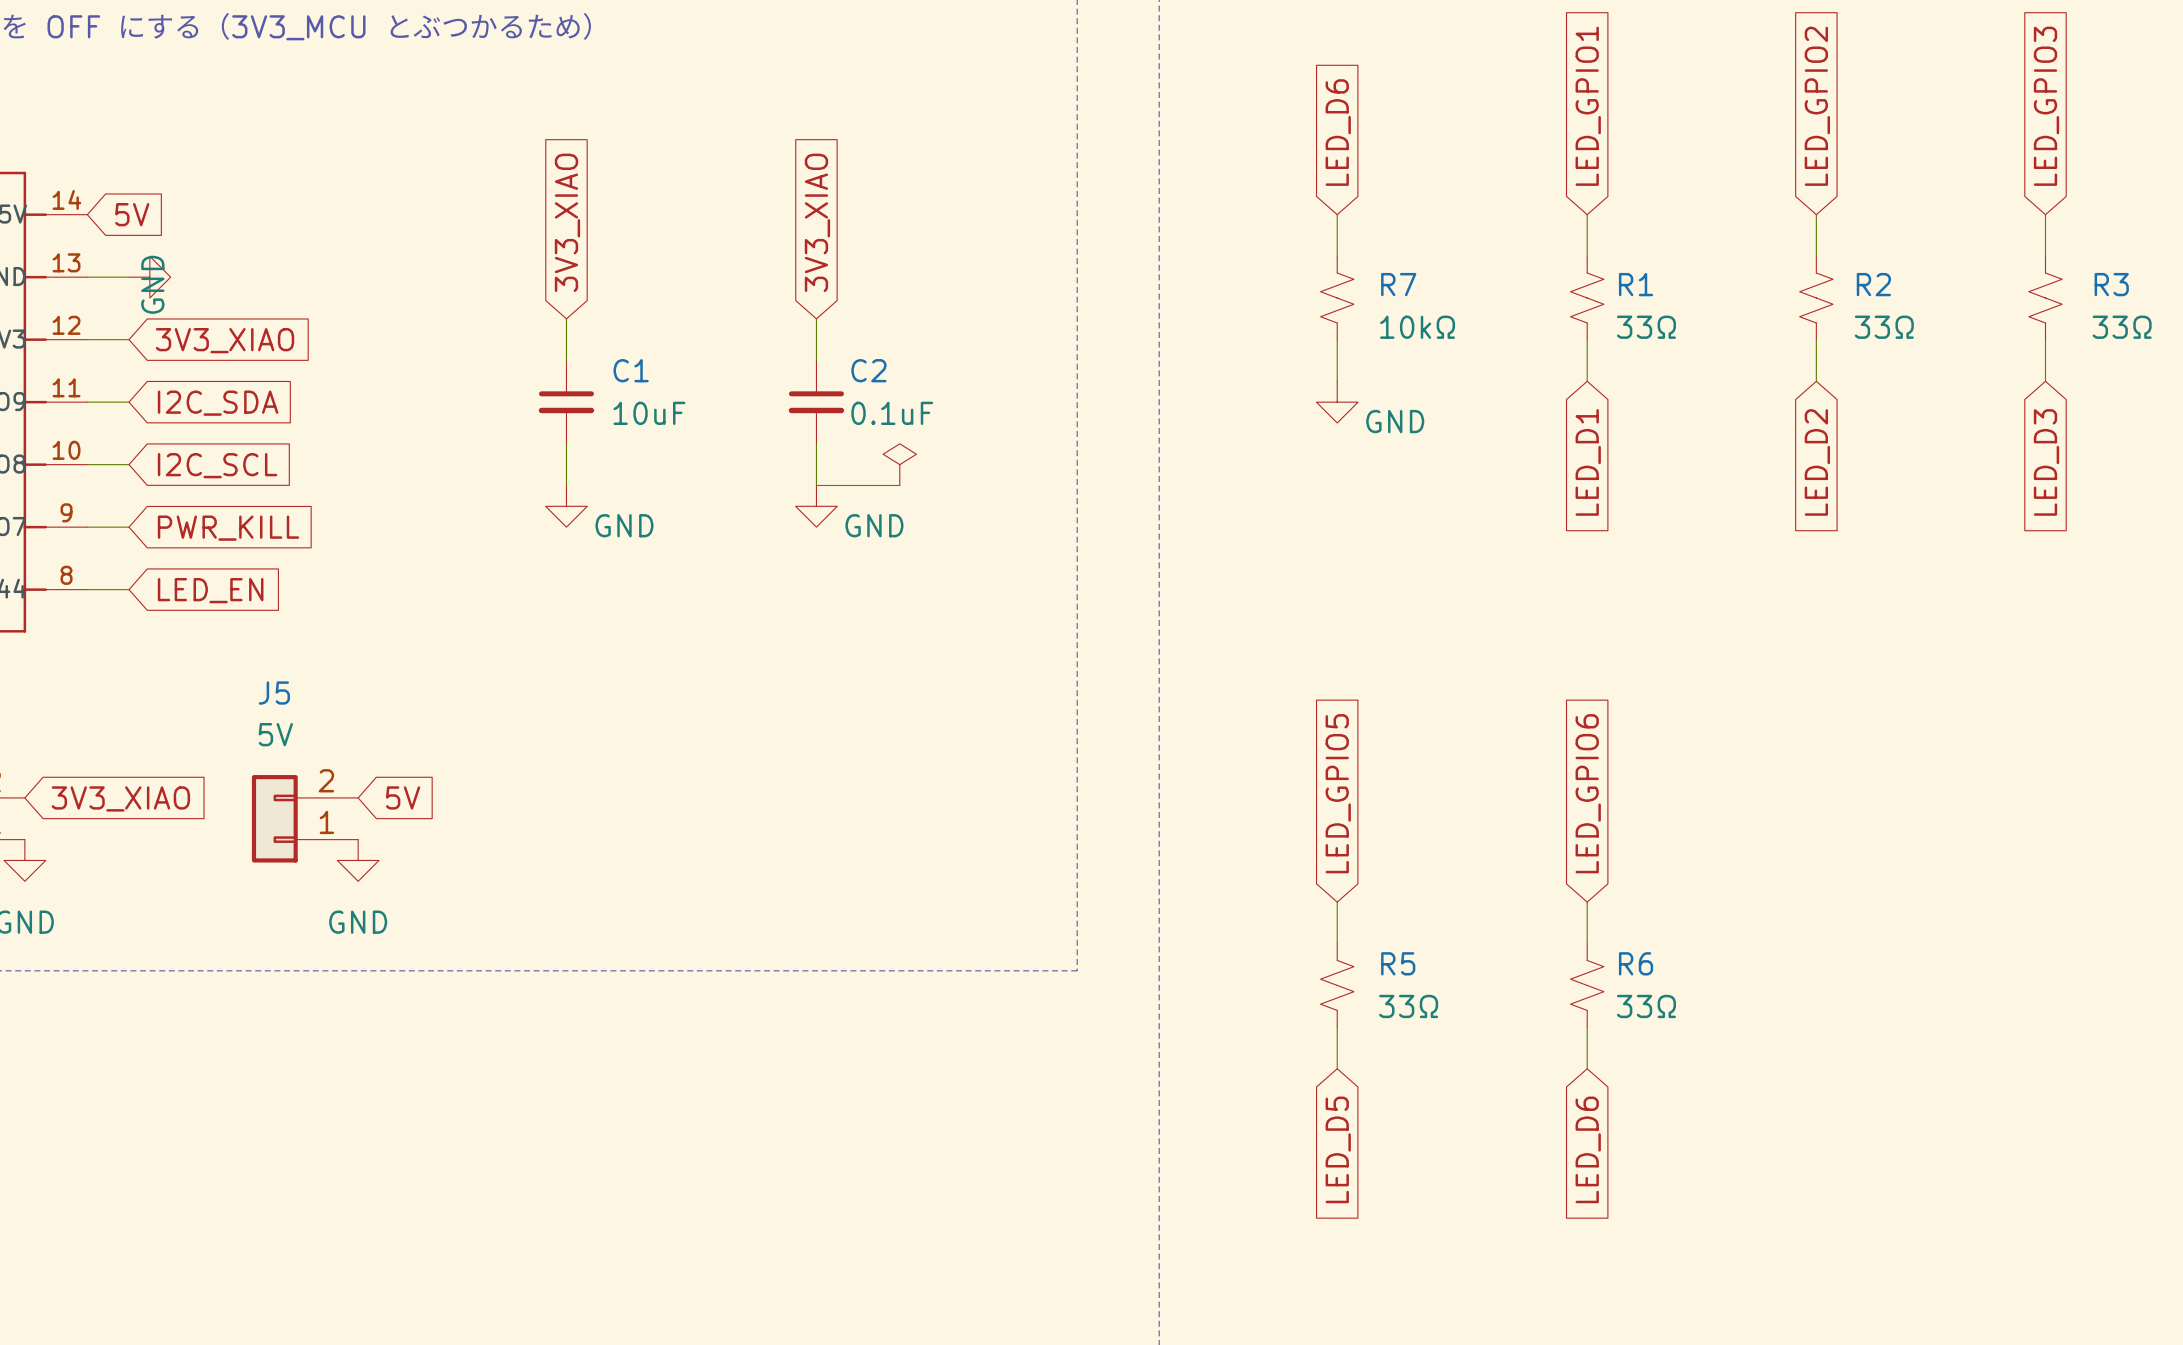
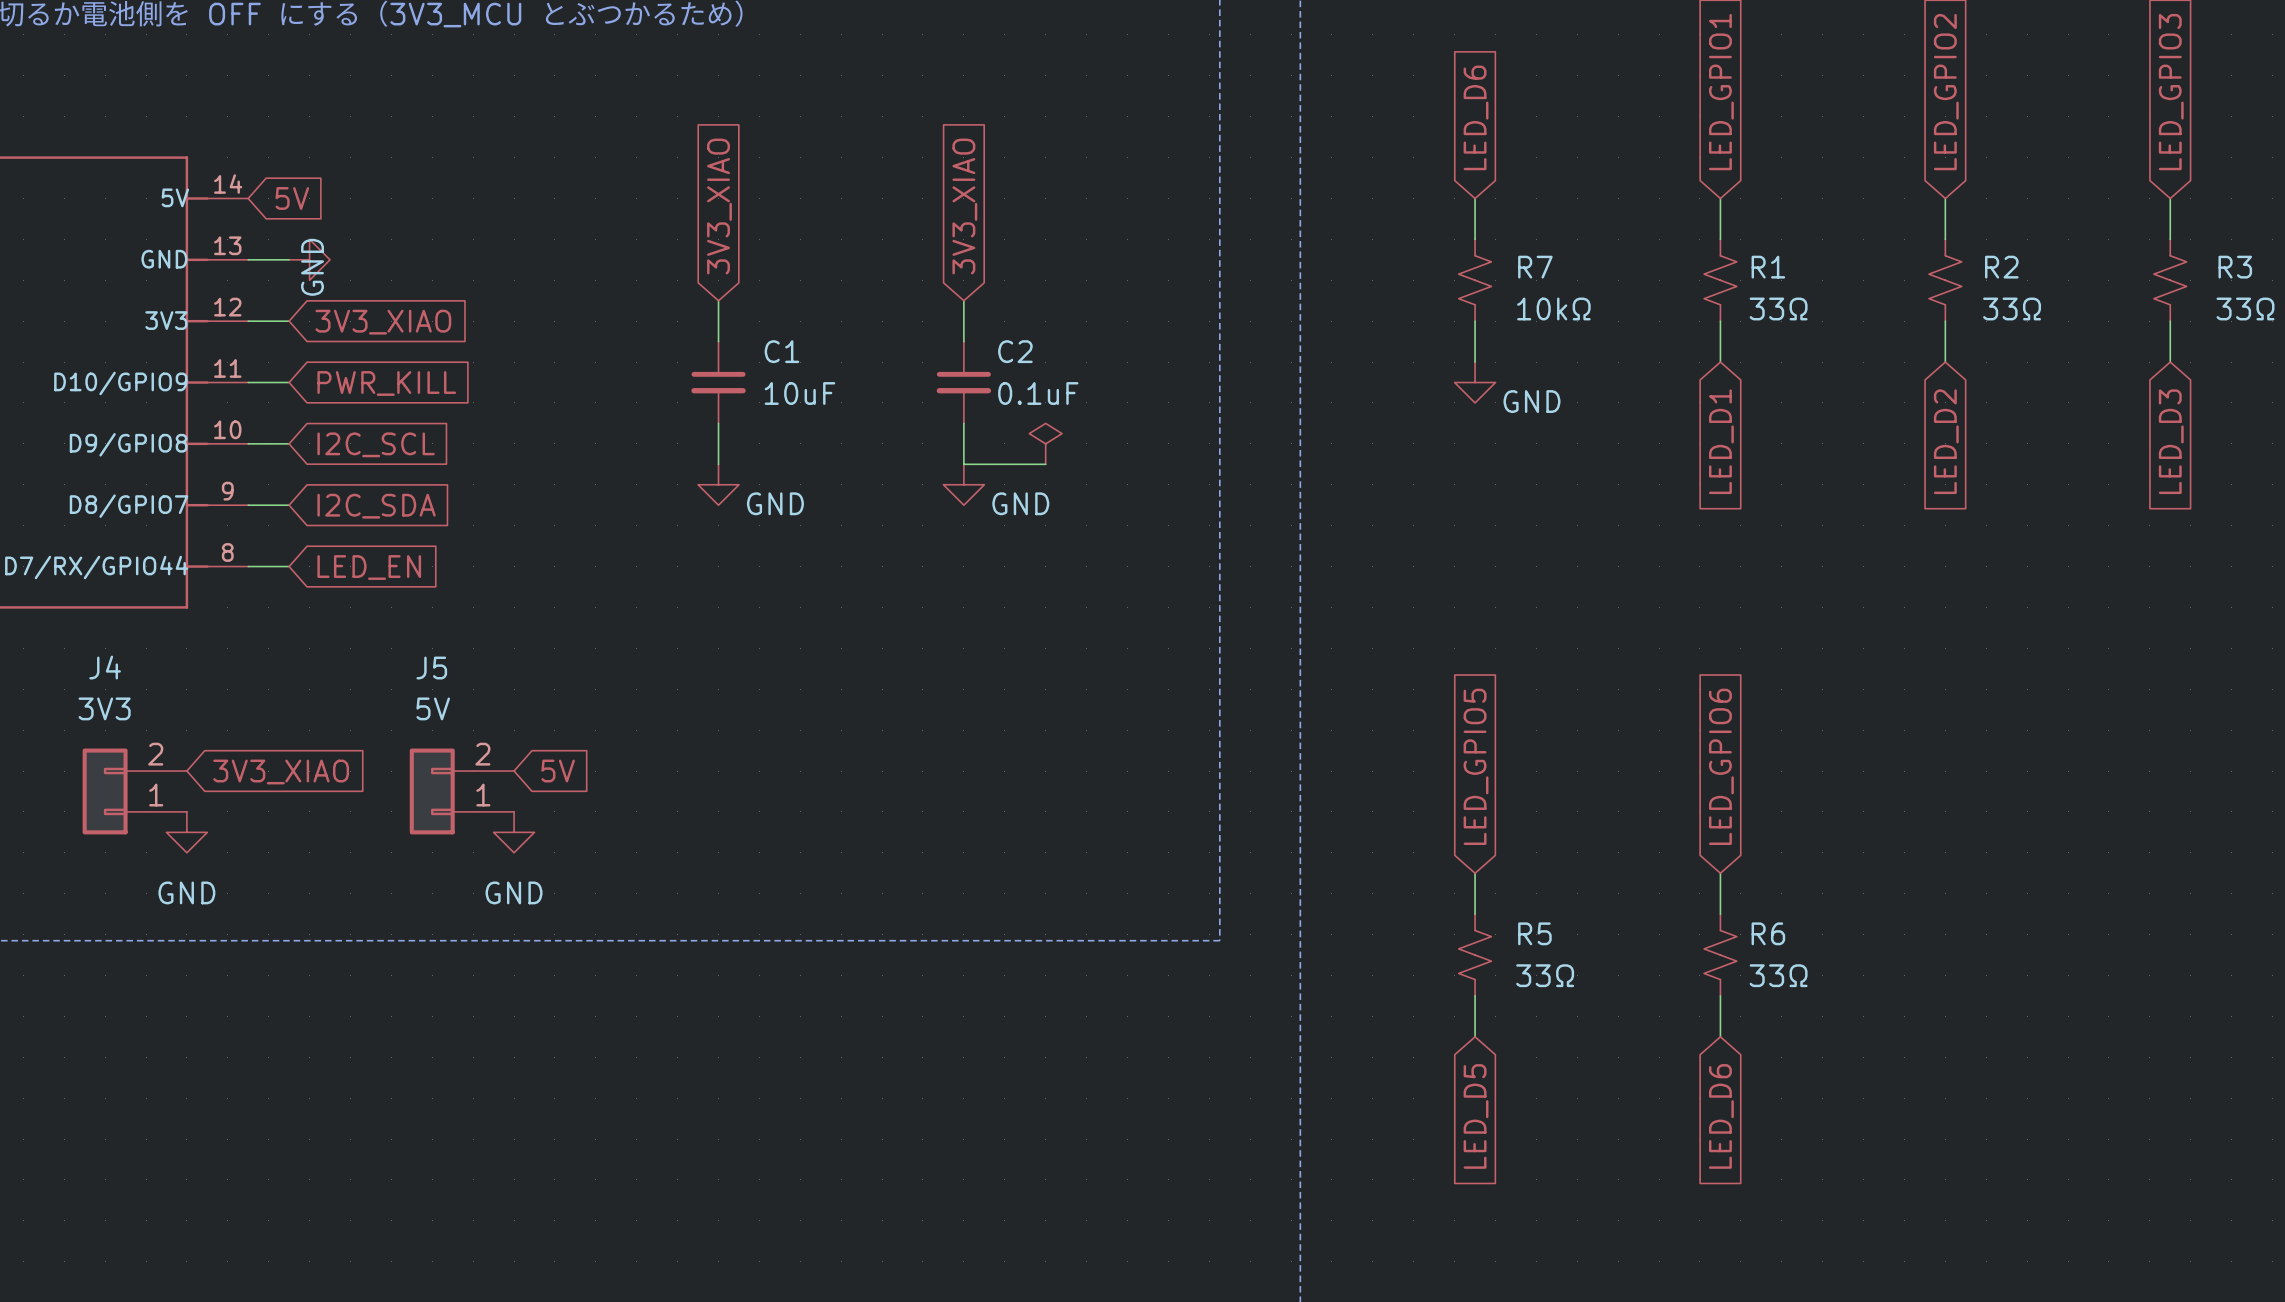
global label: I2C_SDA (218, 403) -> PWR_KILL (386, 383)
global label: PWR_KILL (228, 528) -> I2C_SDA (376, 506)

